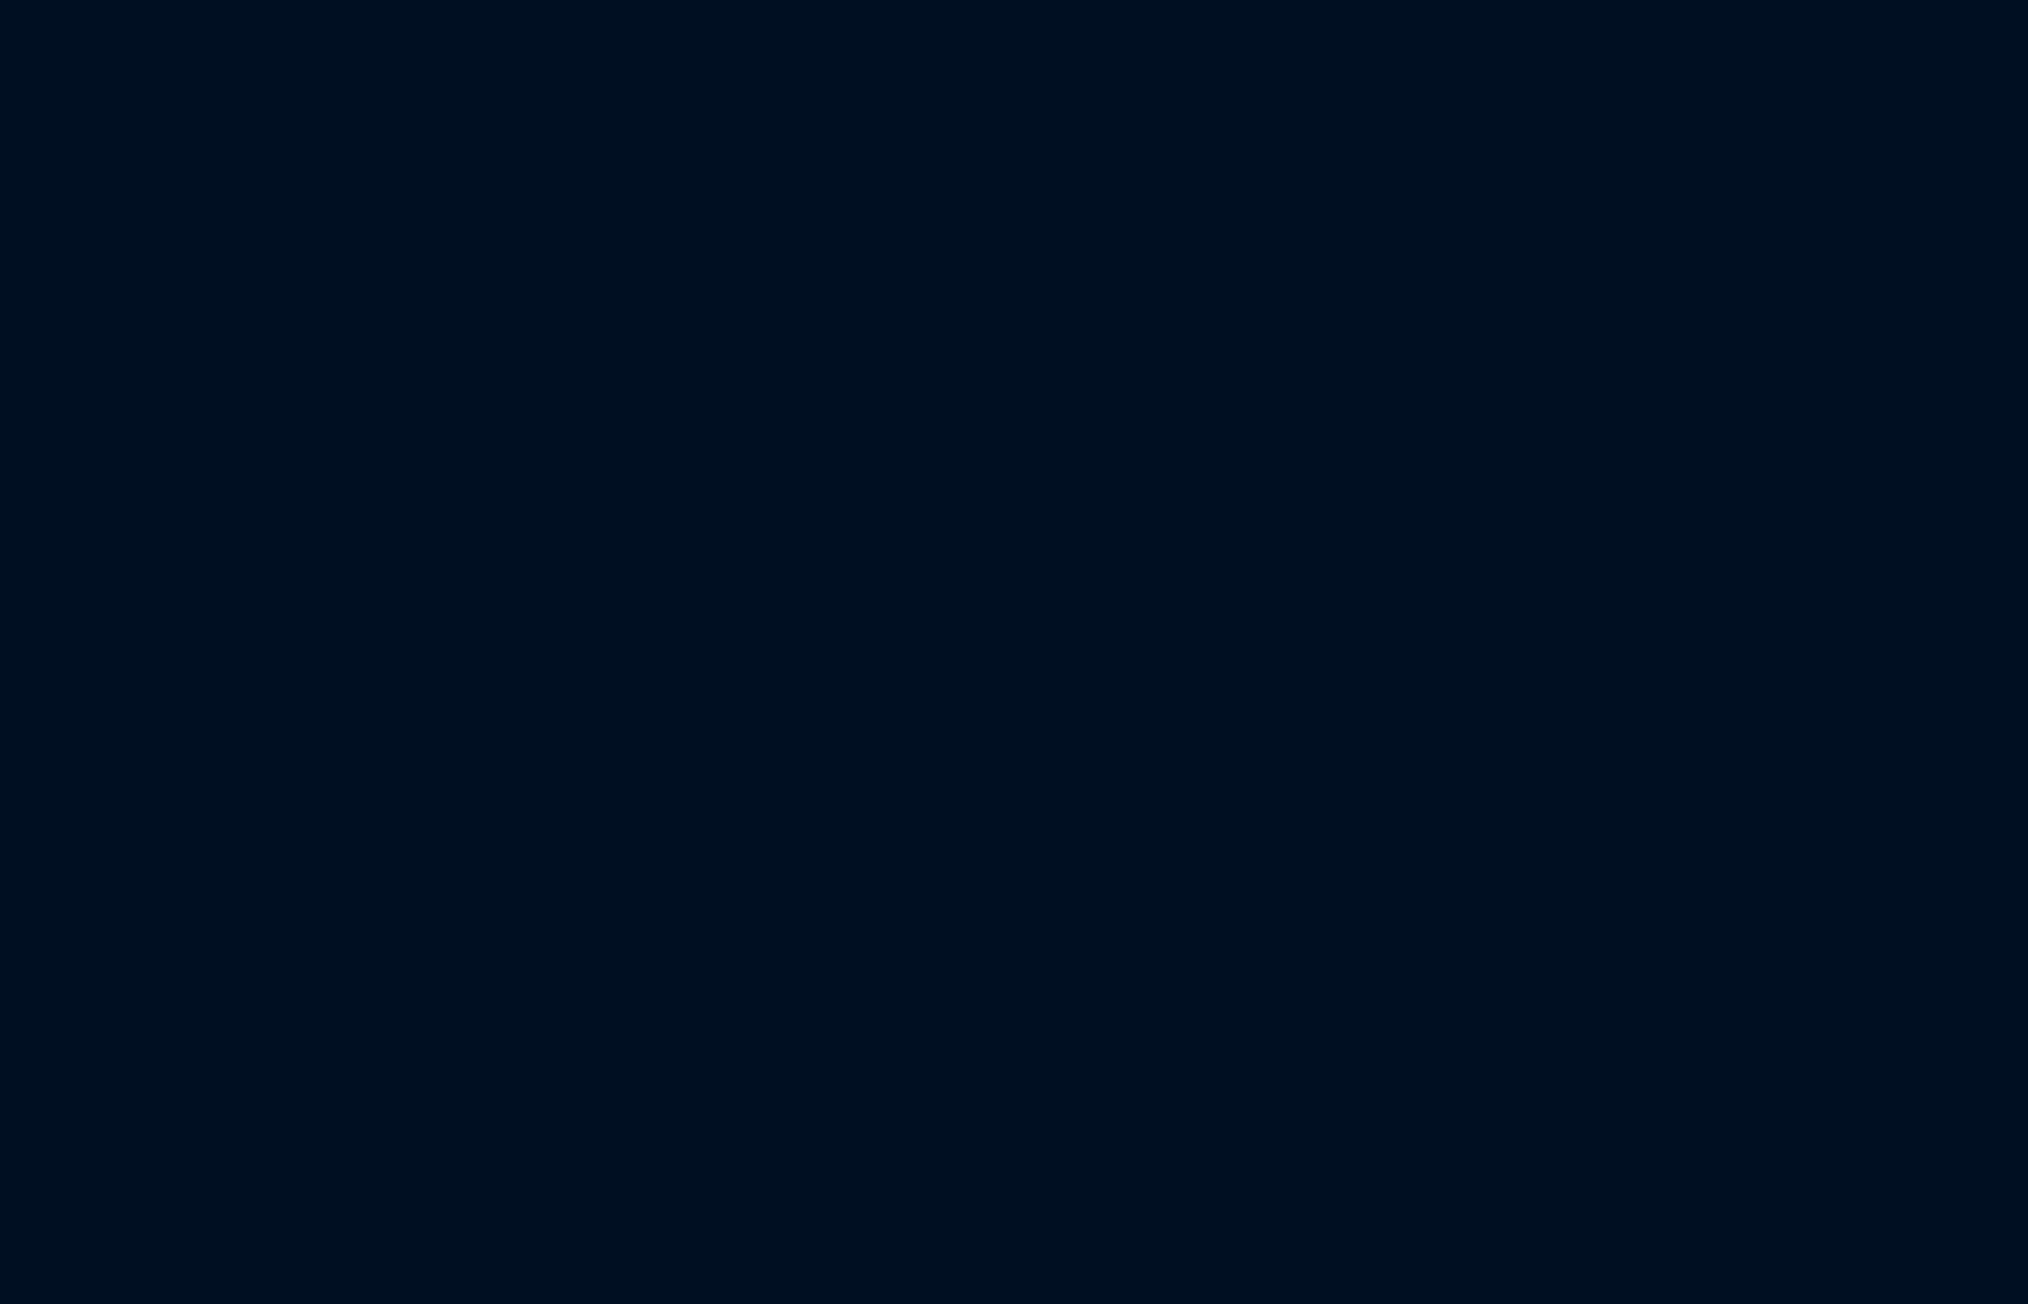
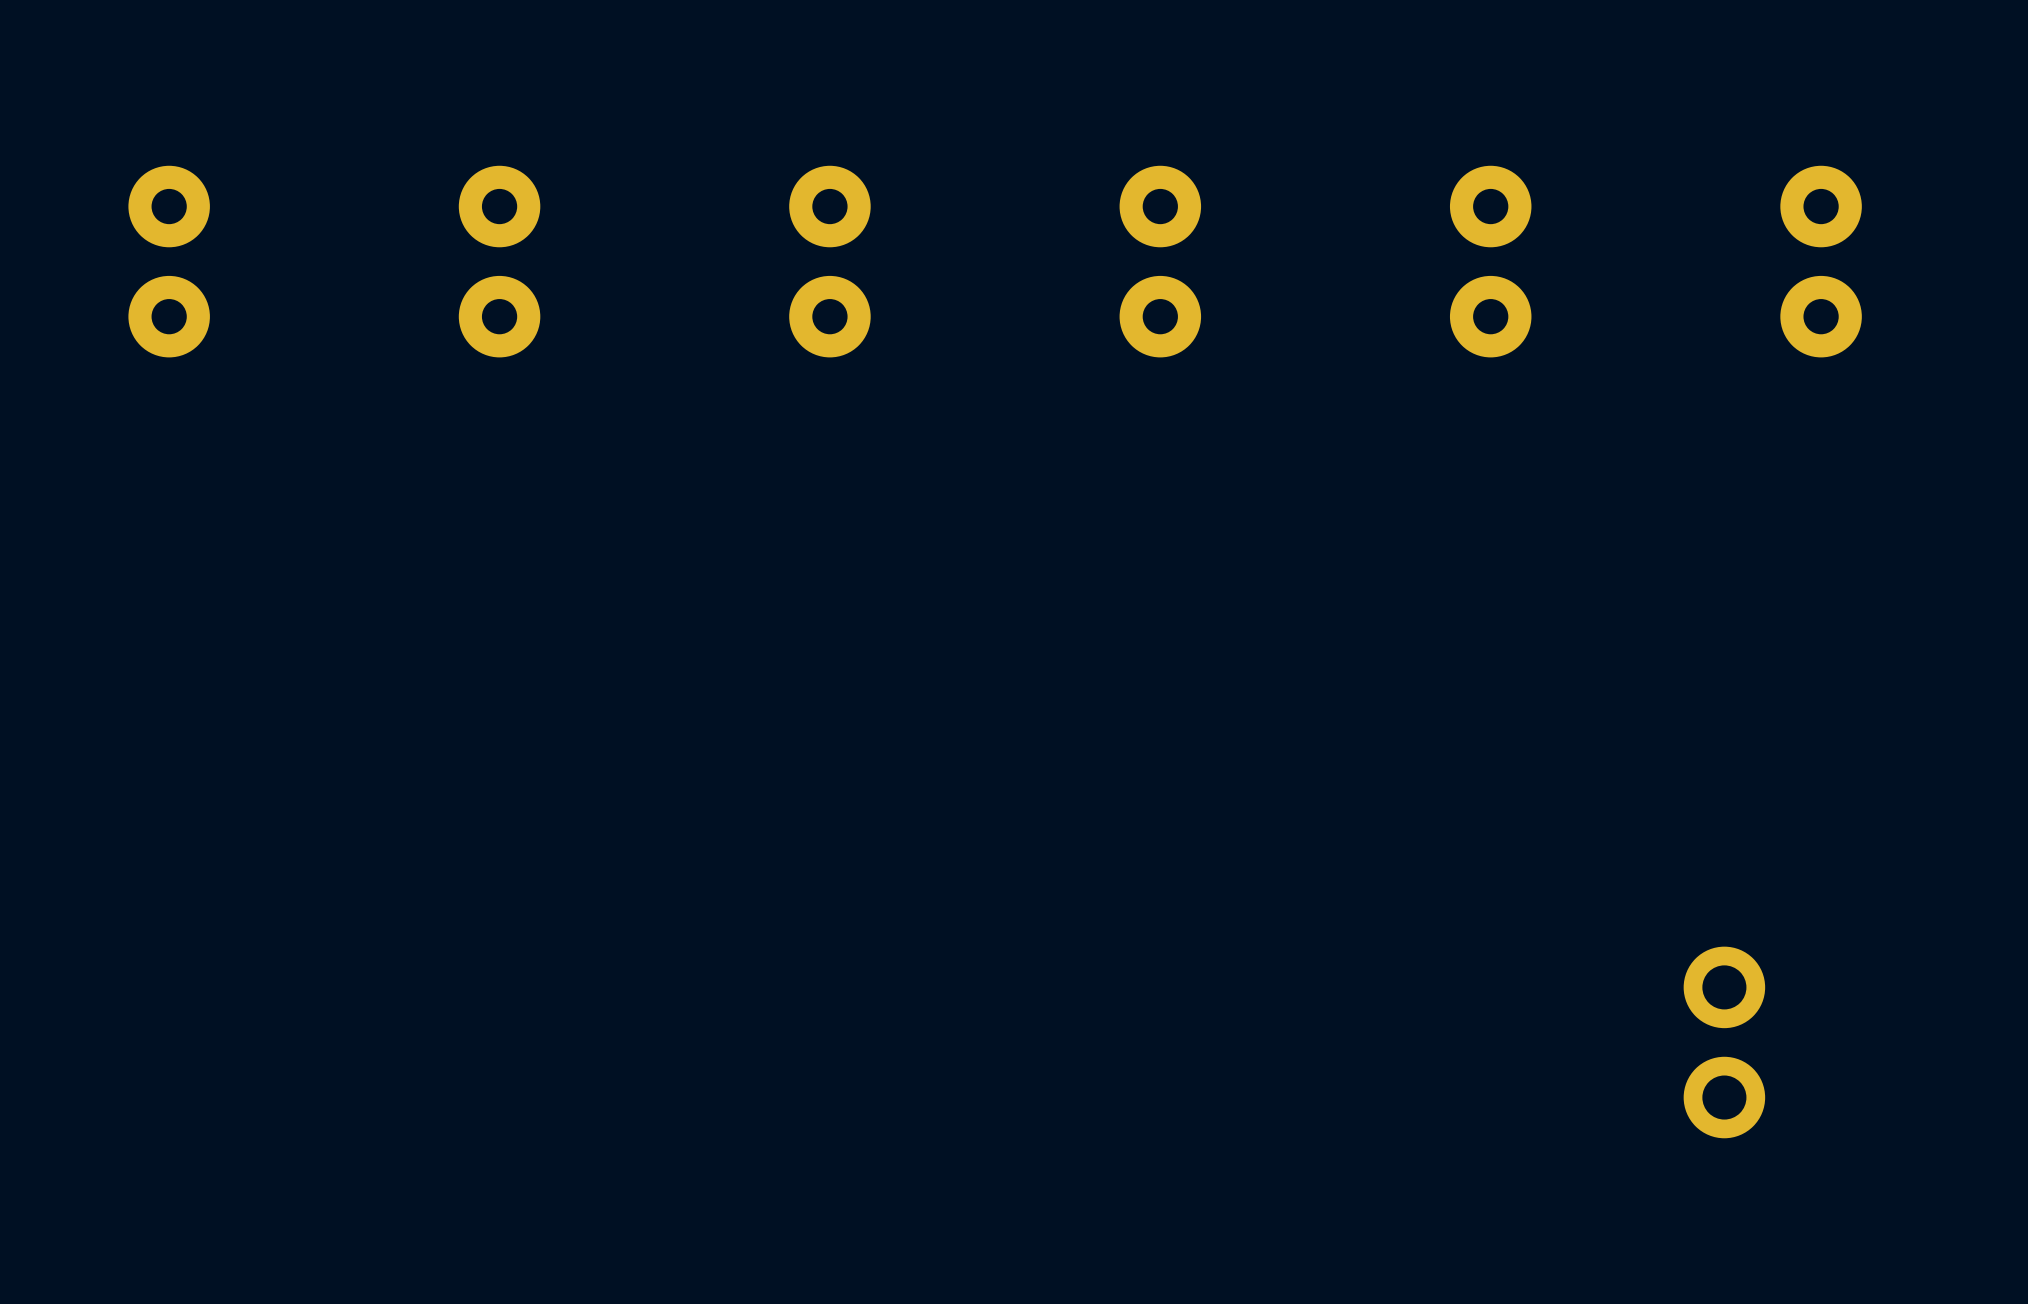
part: none -> (169, 261)
part: none -> (499, 261)
part: none -> (829, 261)
part: none -> (1160, 261)
part: none -> (1490, 261)
part: none -> (1821, 261)
part: none -> (1724, 987)
part: none -> (1724, 1097)

